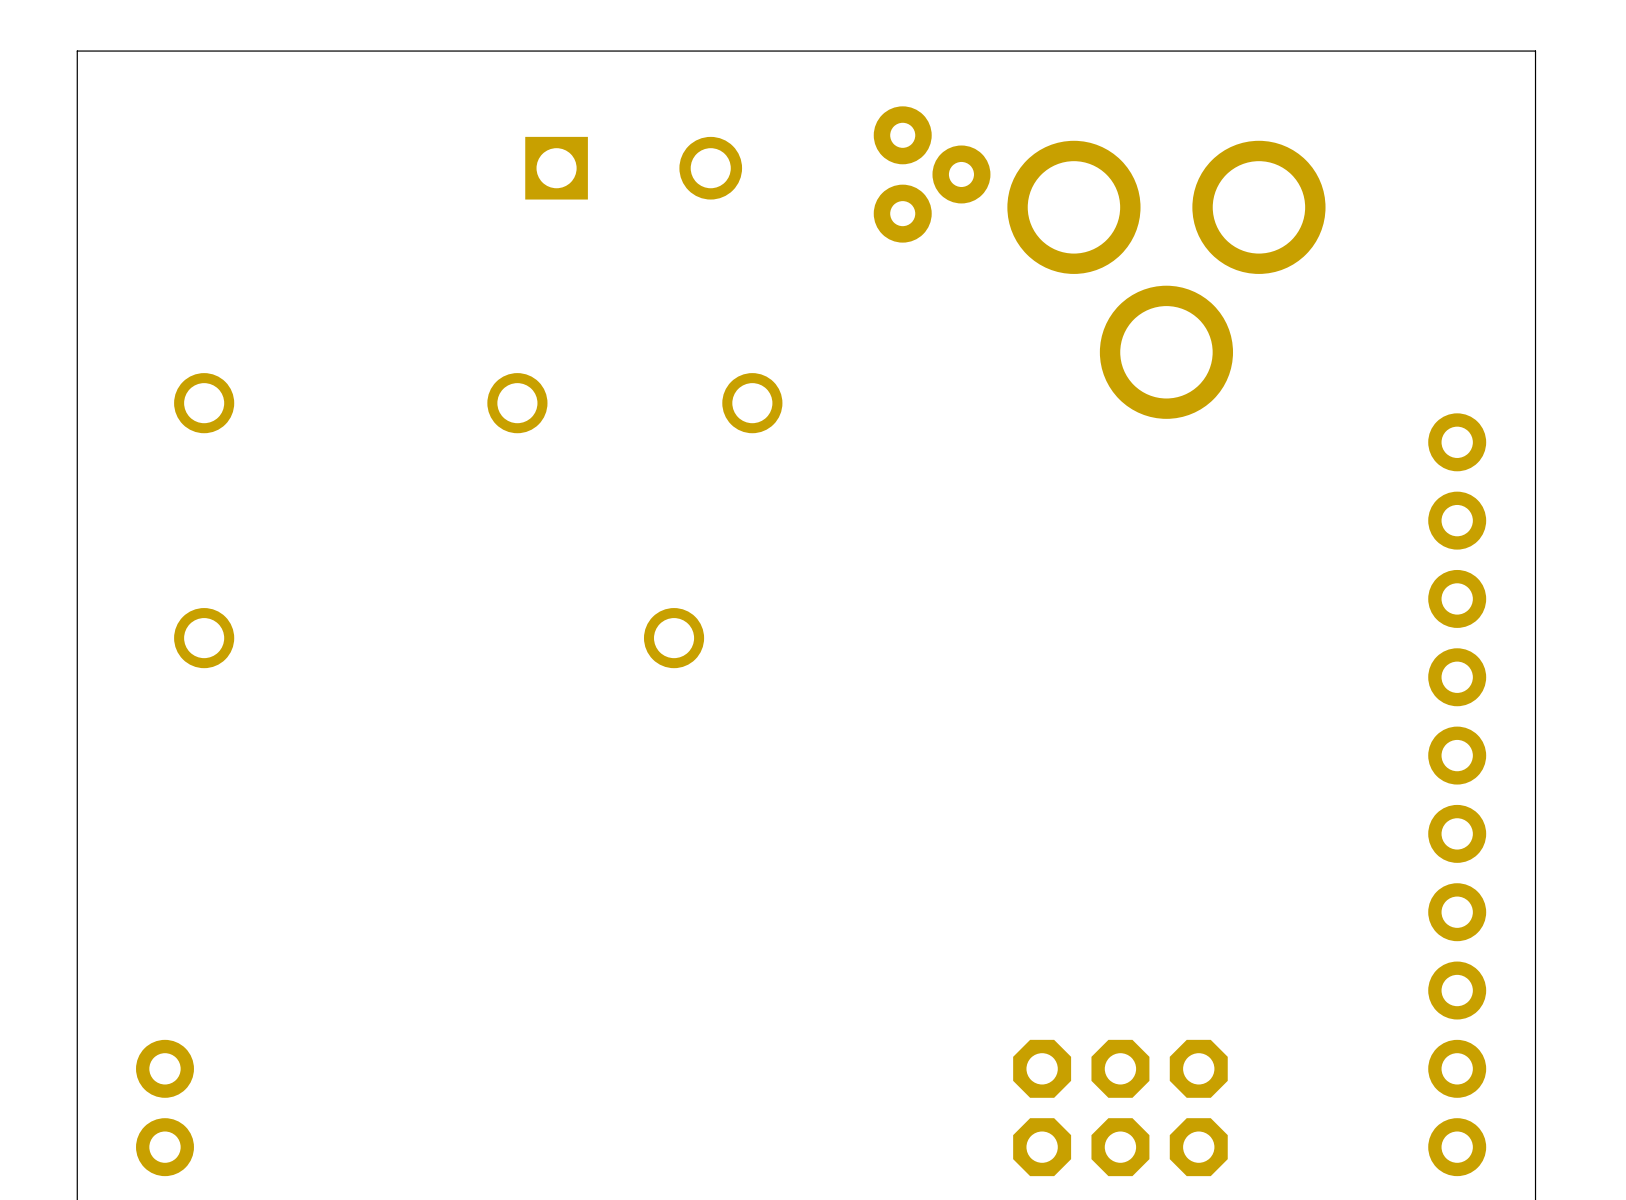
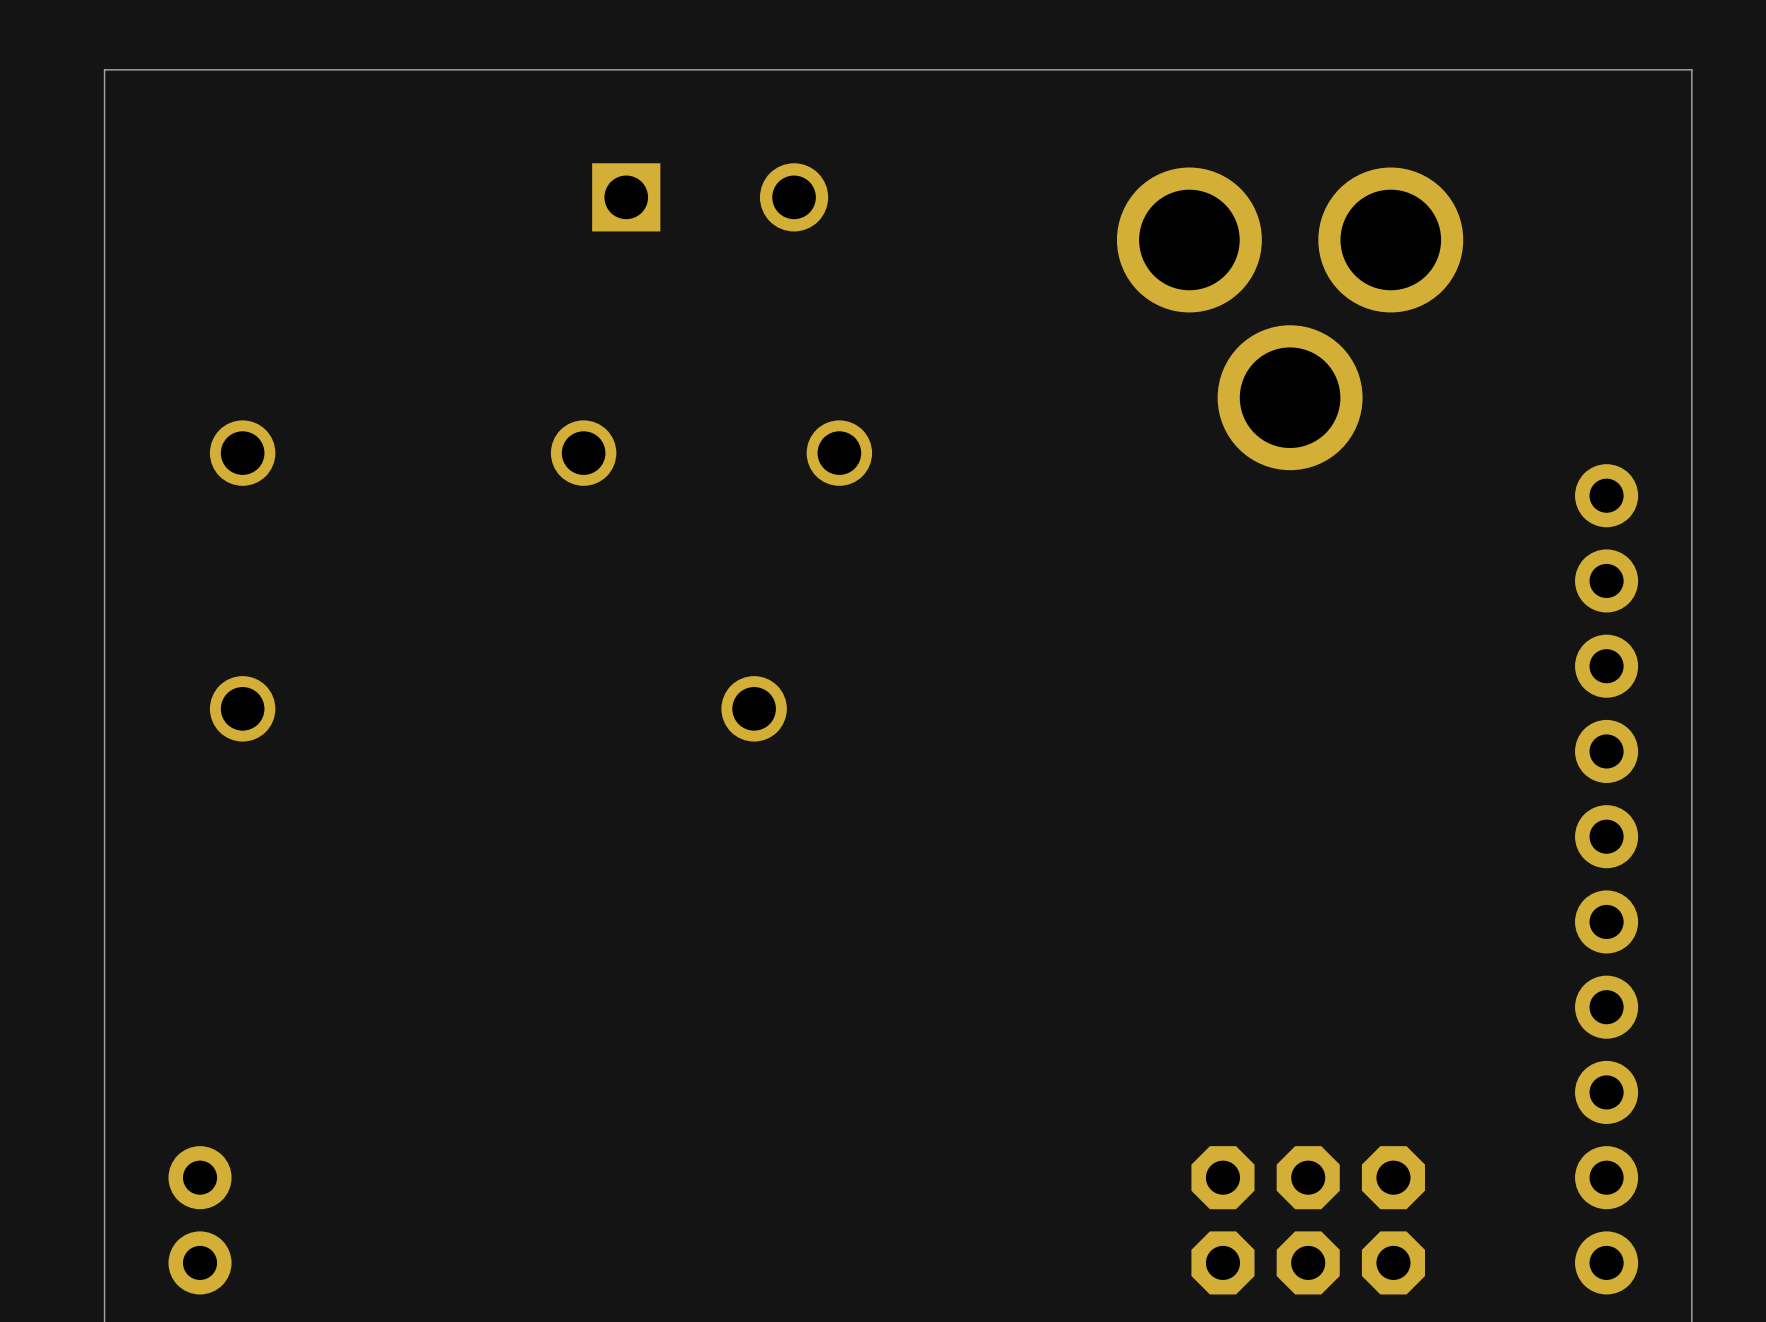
part: (932, 174) -> none
part position: (1120, 1107) -> (1308, 1220)

